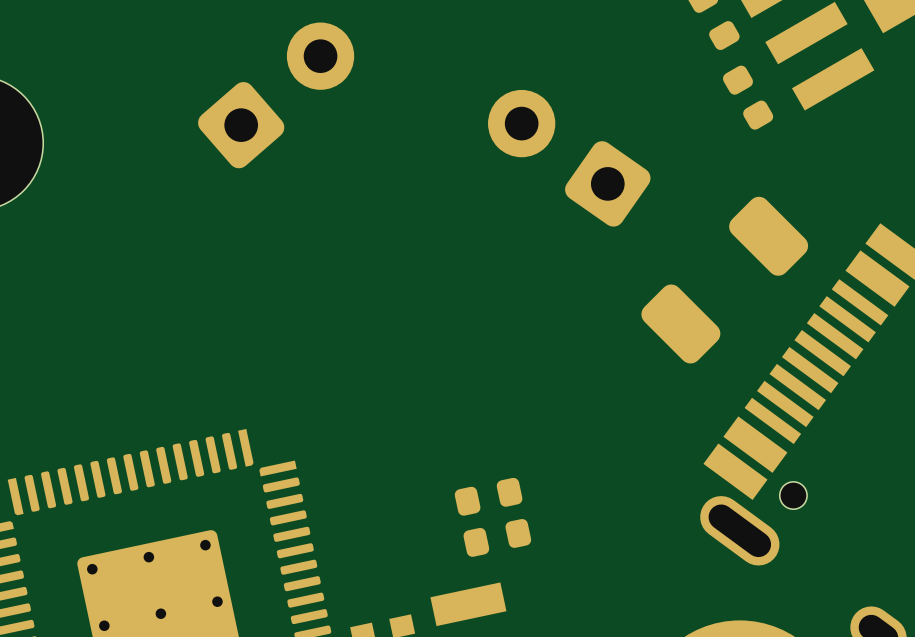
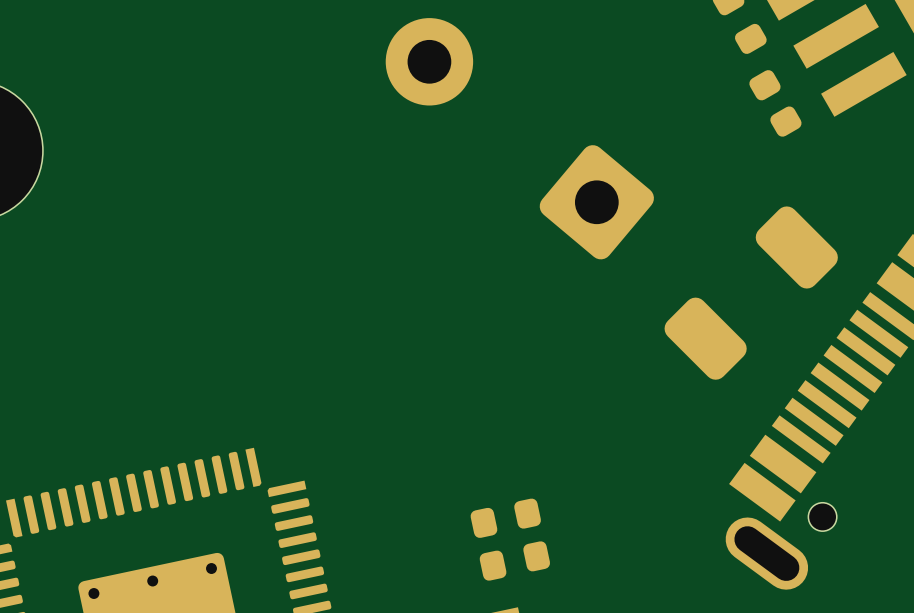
part: (276, 95) -> none
part: none -> (519, 138)
part: (569, 158) -> none

